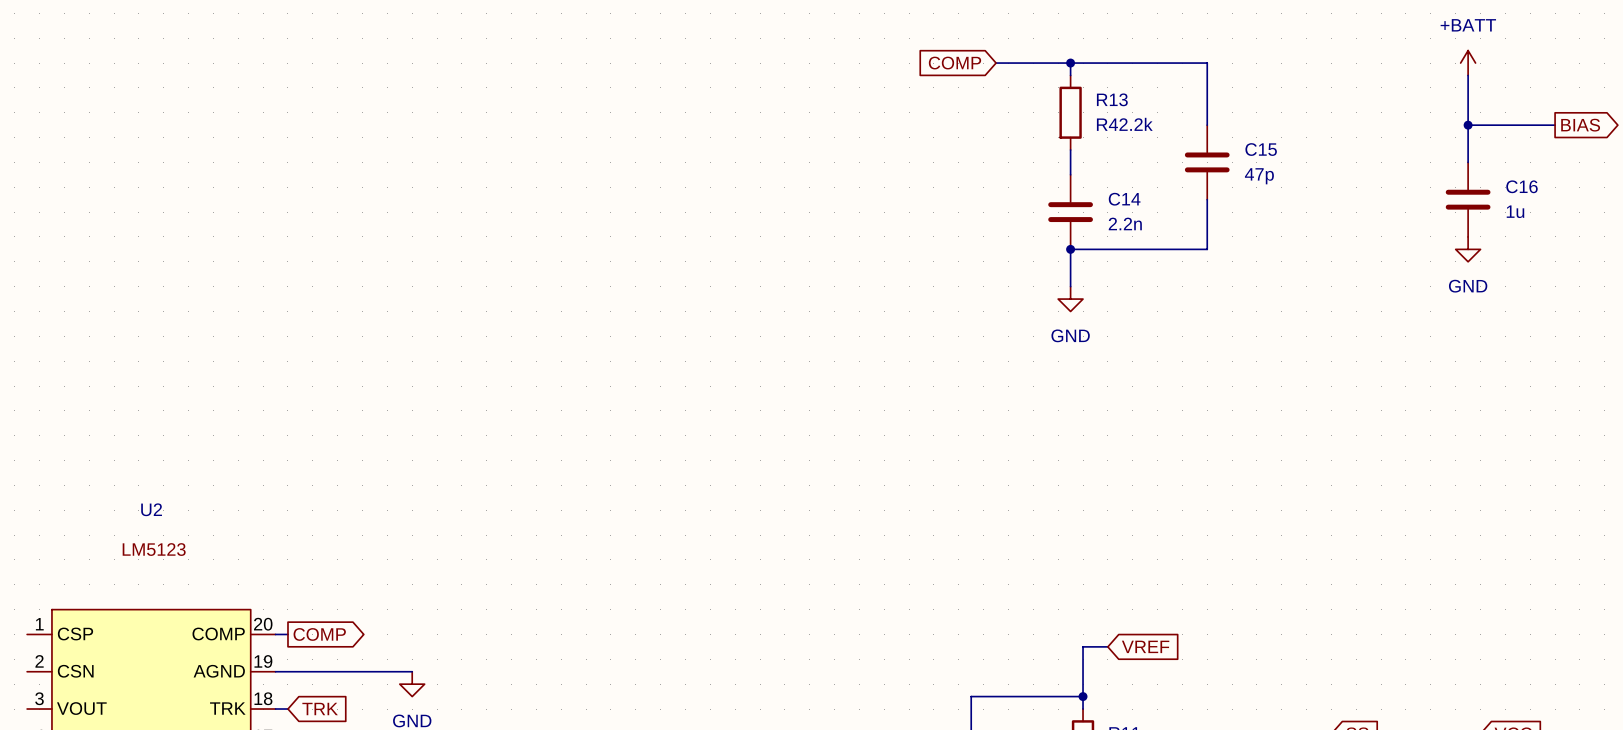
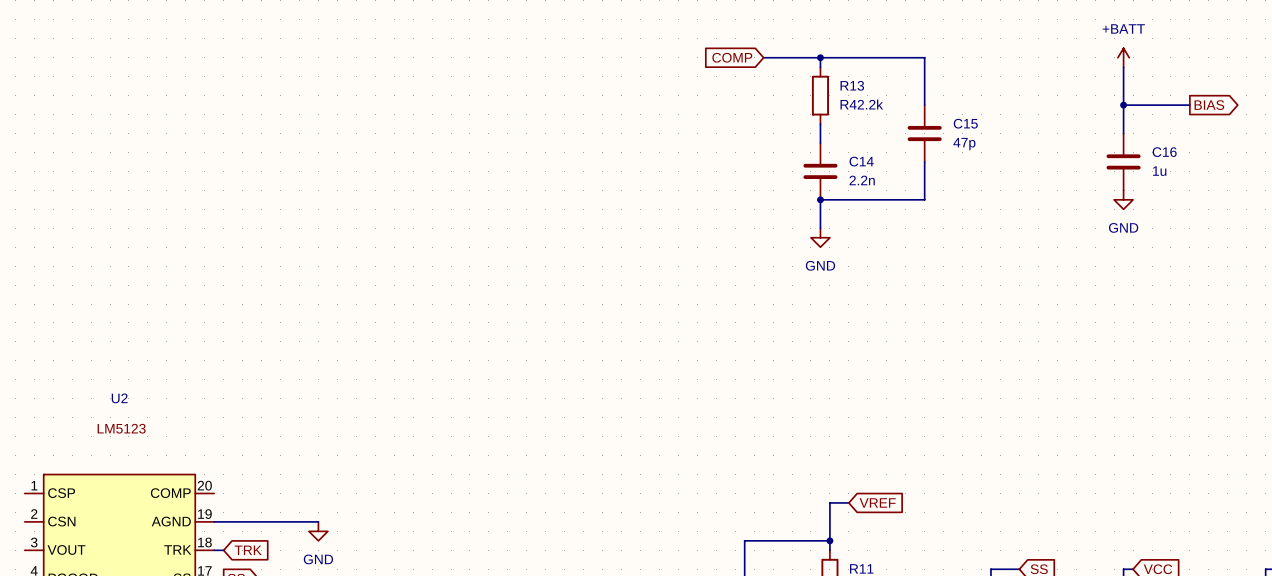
wire: (275, 634) (287, 634) -> none
global label: COMP (319, 634) -> none

